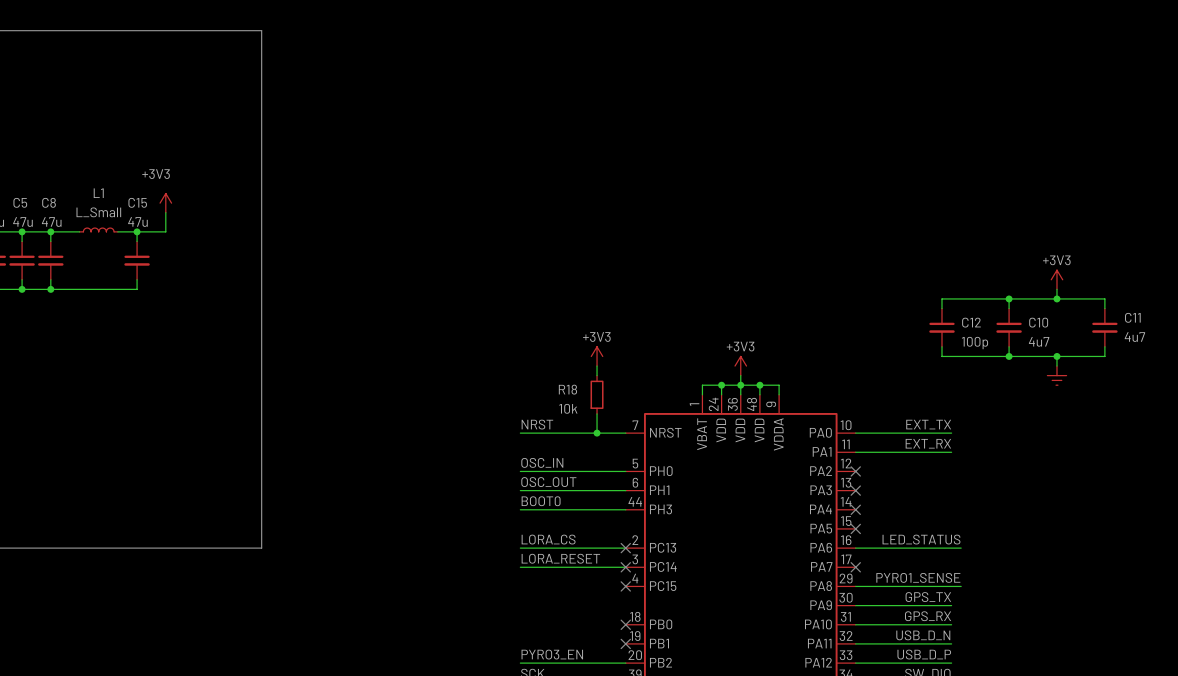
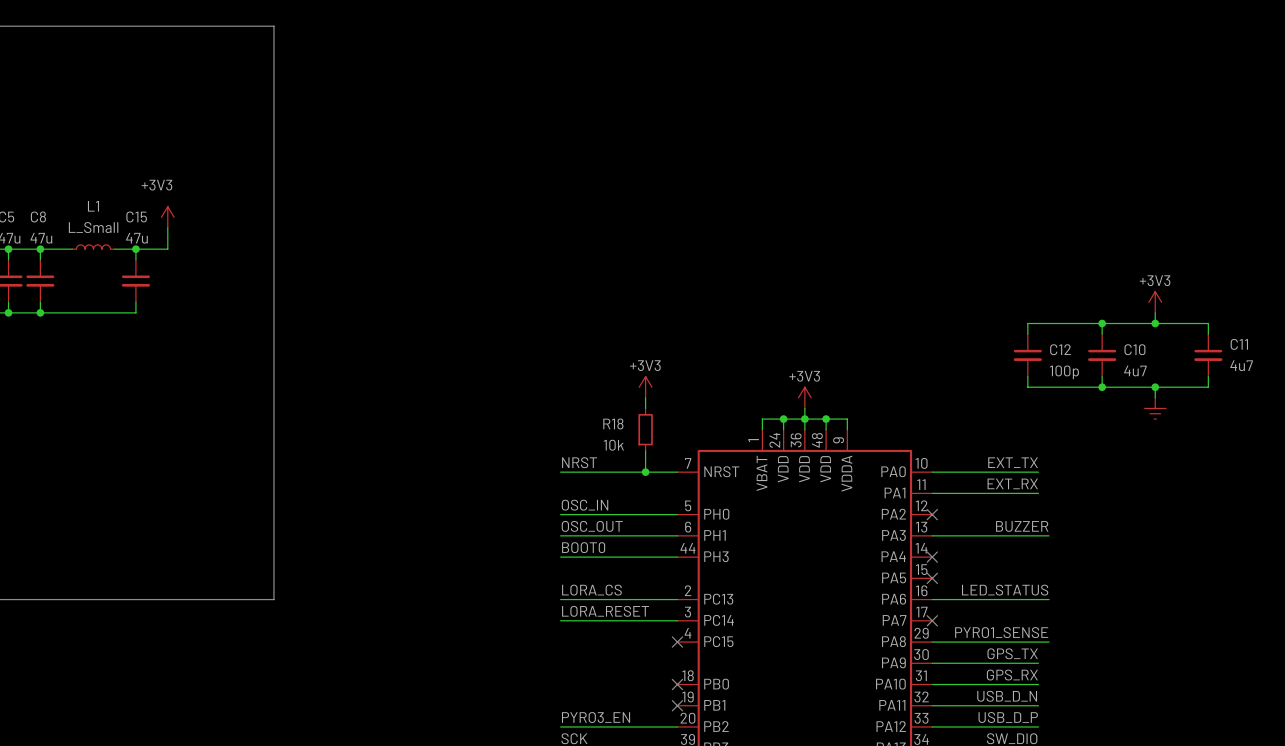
label: none -> BUZZER (1022, 526)
wire: none -> (932, 535) (1049, 535)
no-connect mark: (855, 490) -> none
no-connect mark: (625, 548) -> none
no-connect mark: (625, 567) -> none

